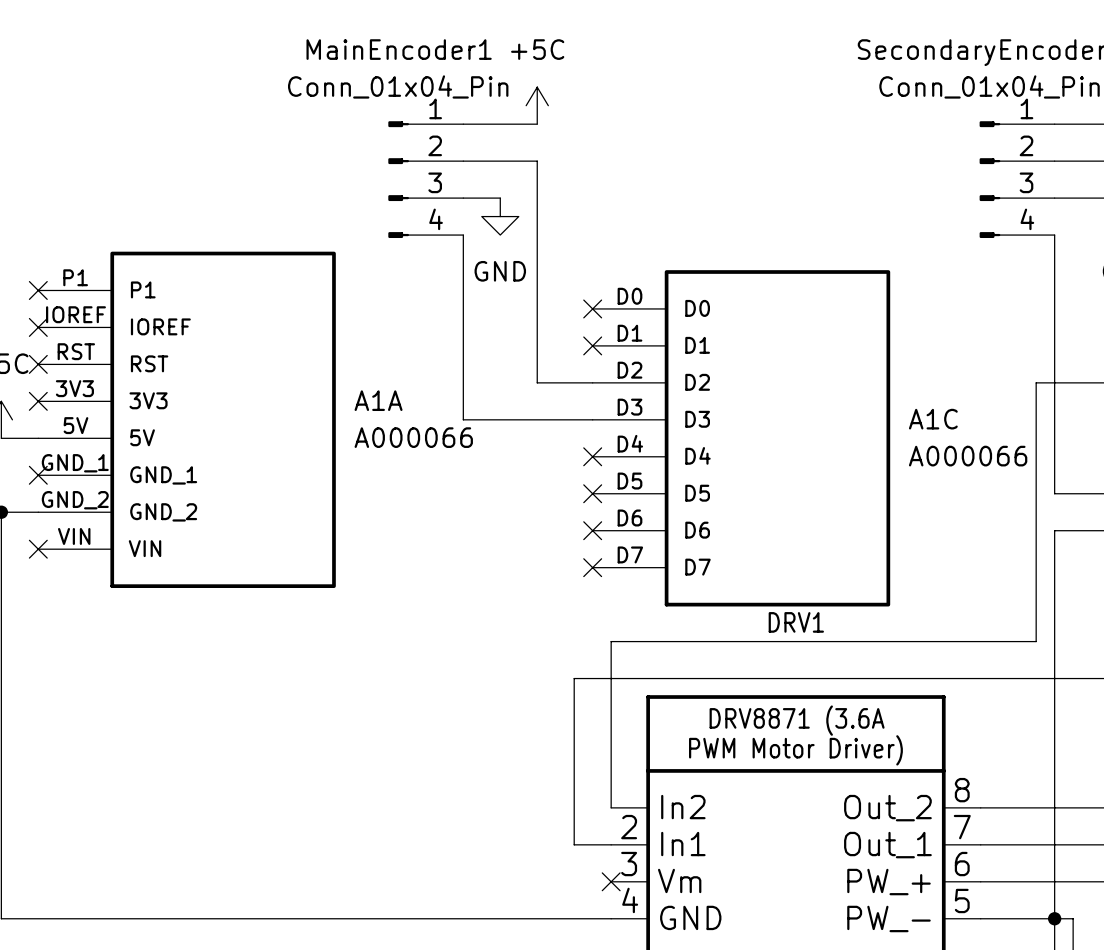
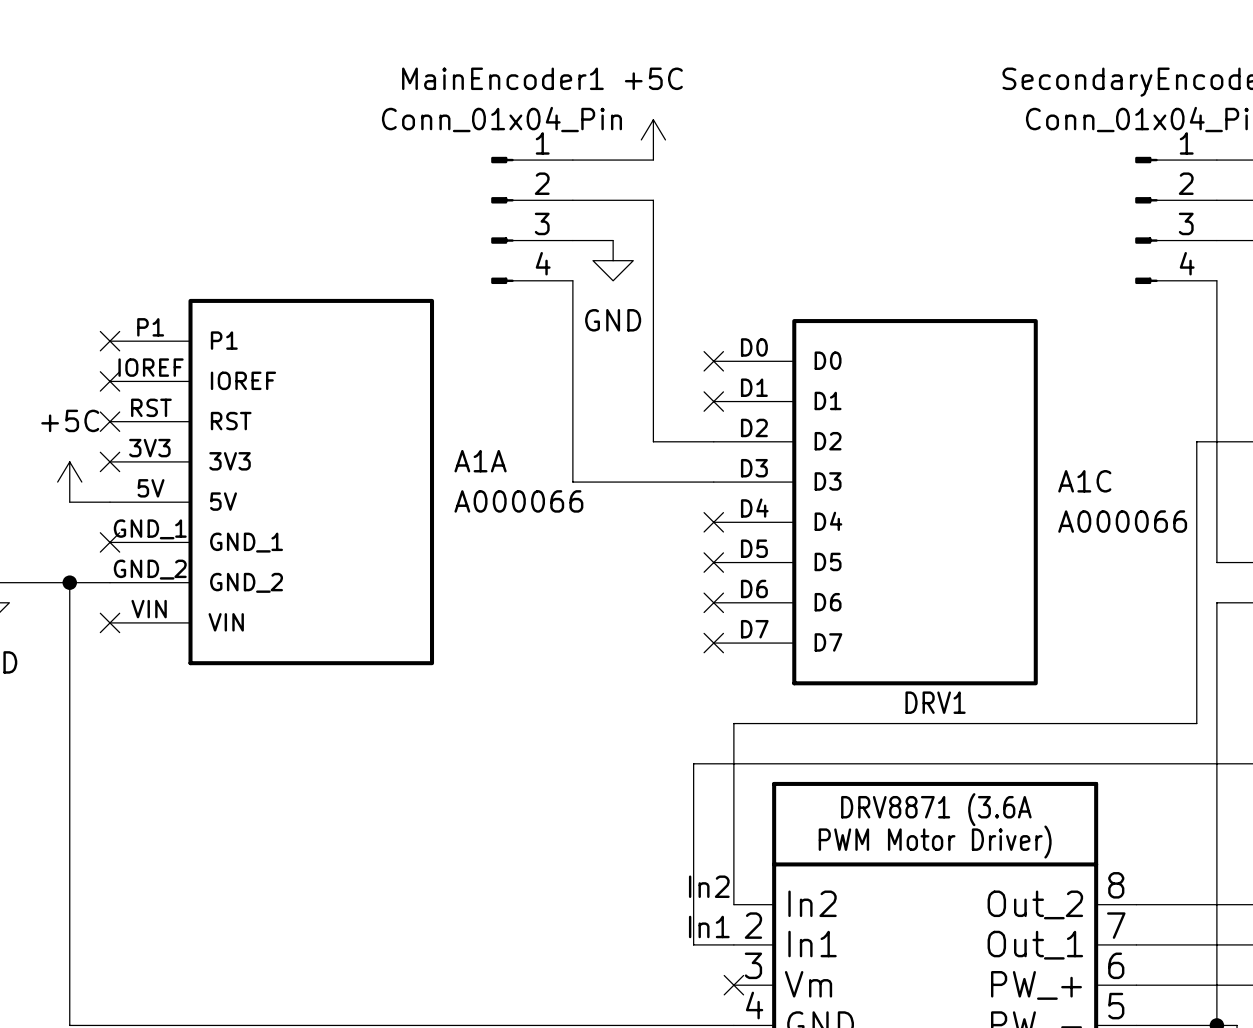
label: none -> In2 (709, 886)
label: none -> In1 (709, 926)

